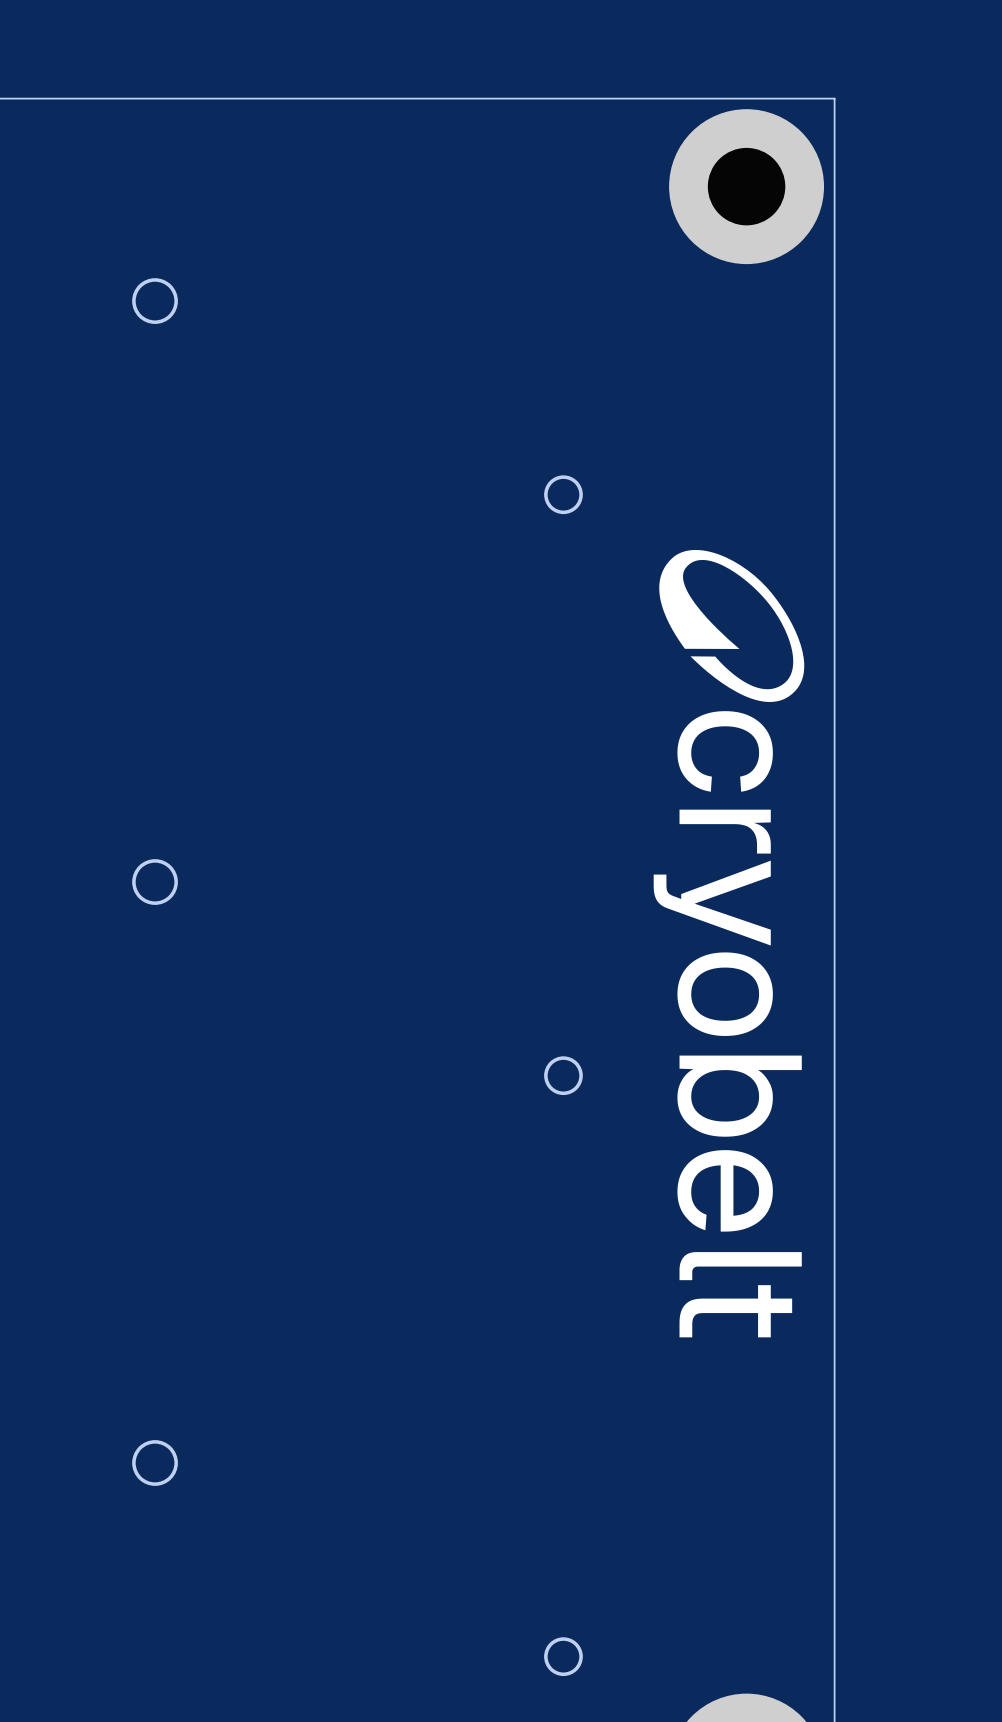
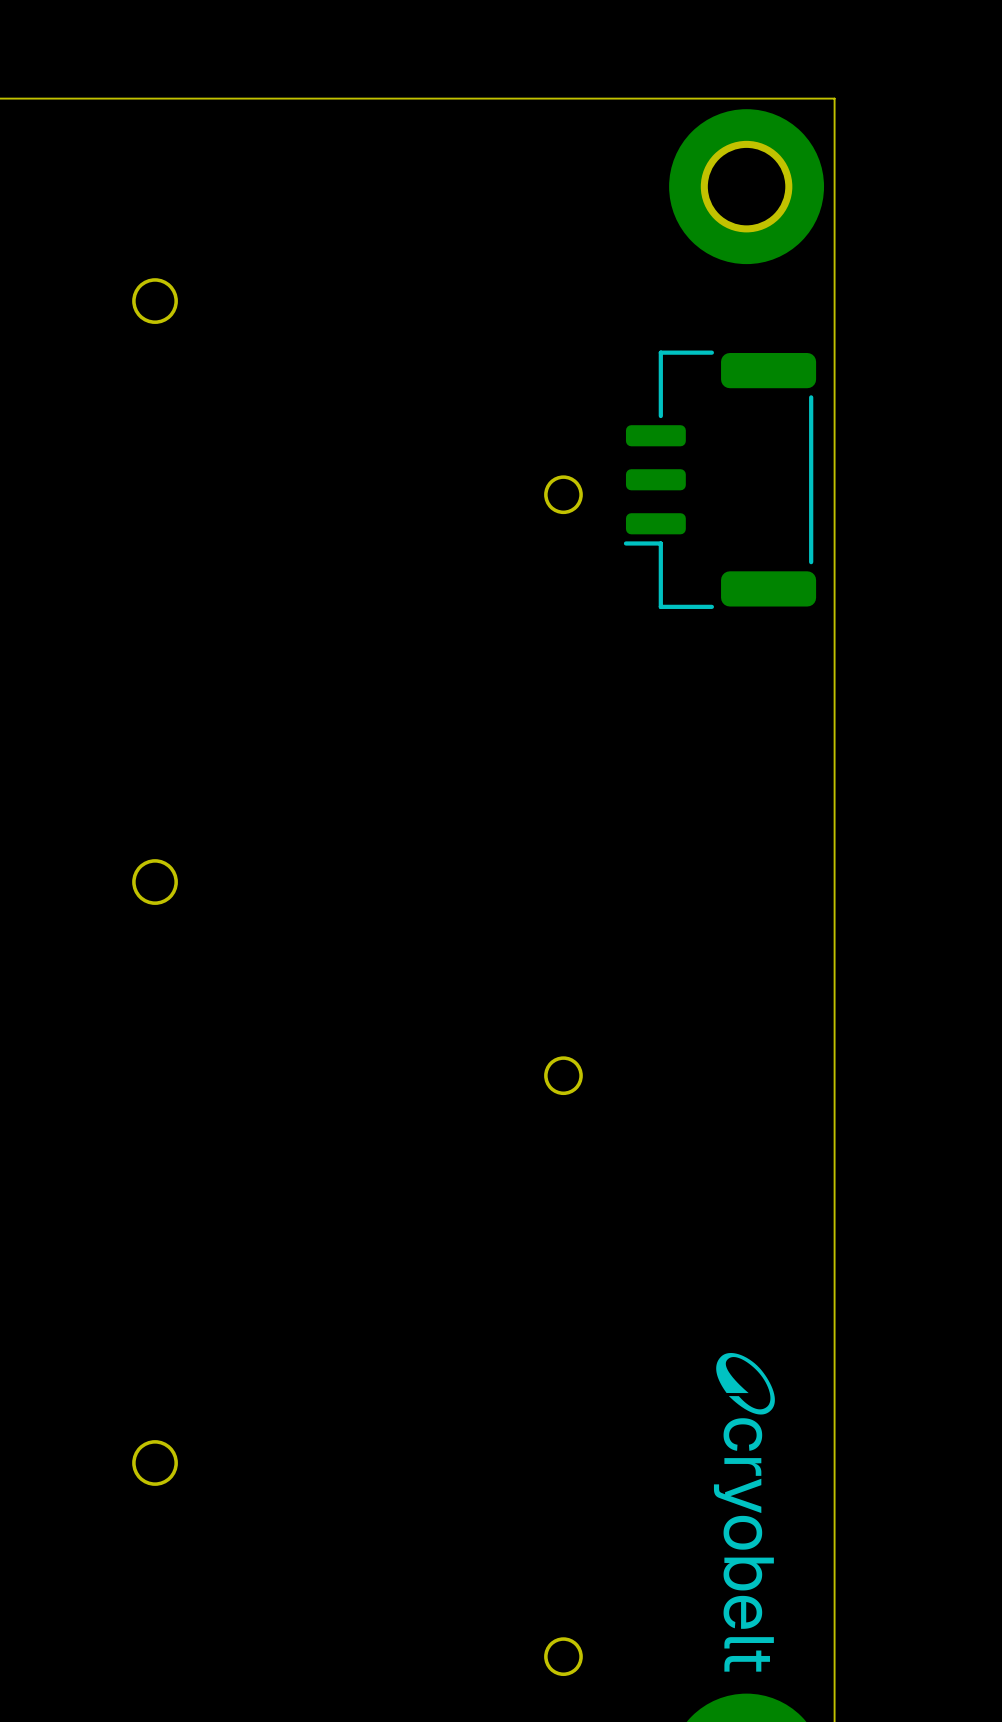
part: none -> (719, 479)
drawing: [653, 549, 805, 1338] -> none
drawing: none -> [713, 1352, 775, 1672]

